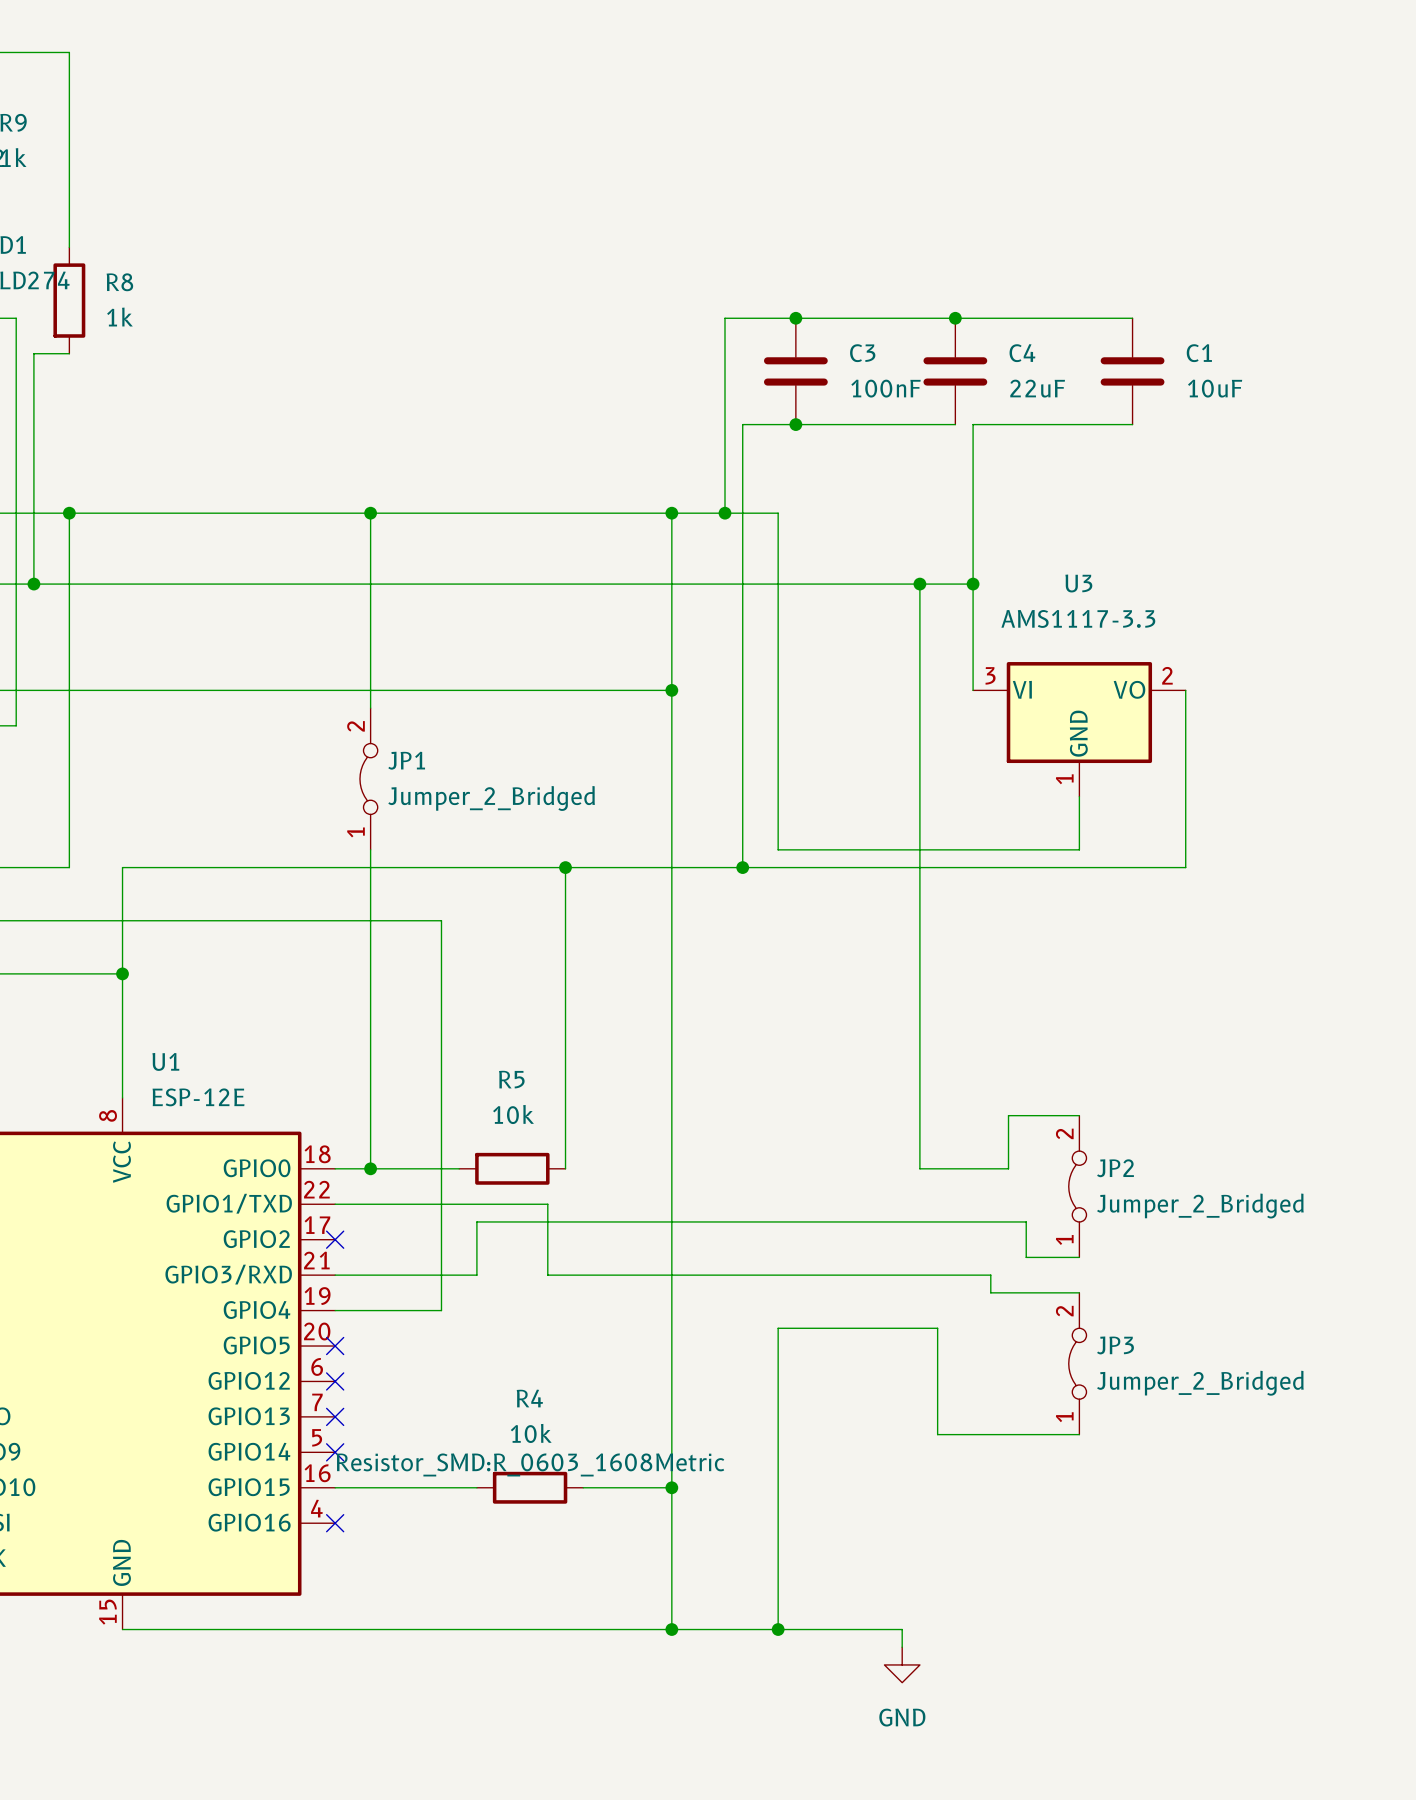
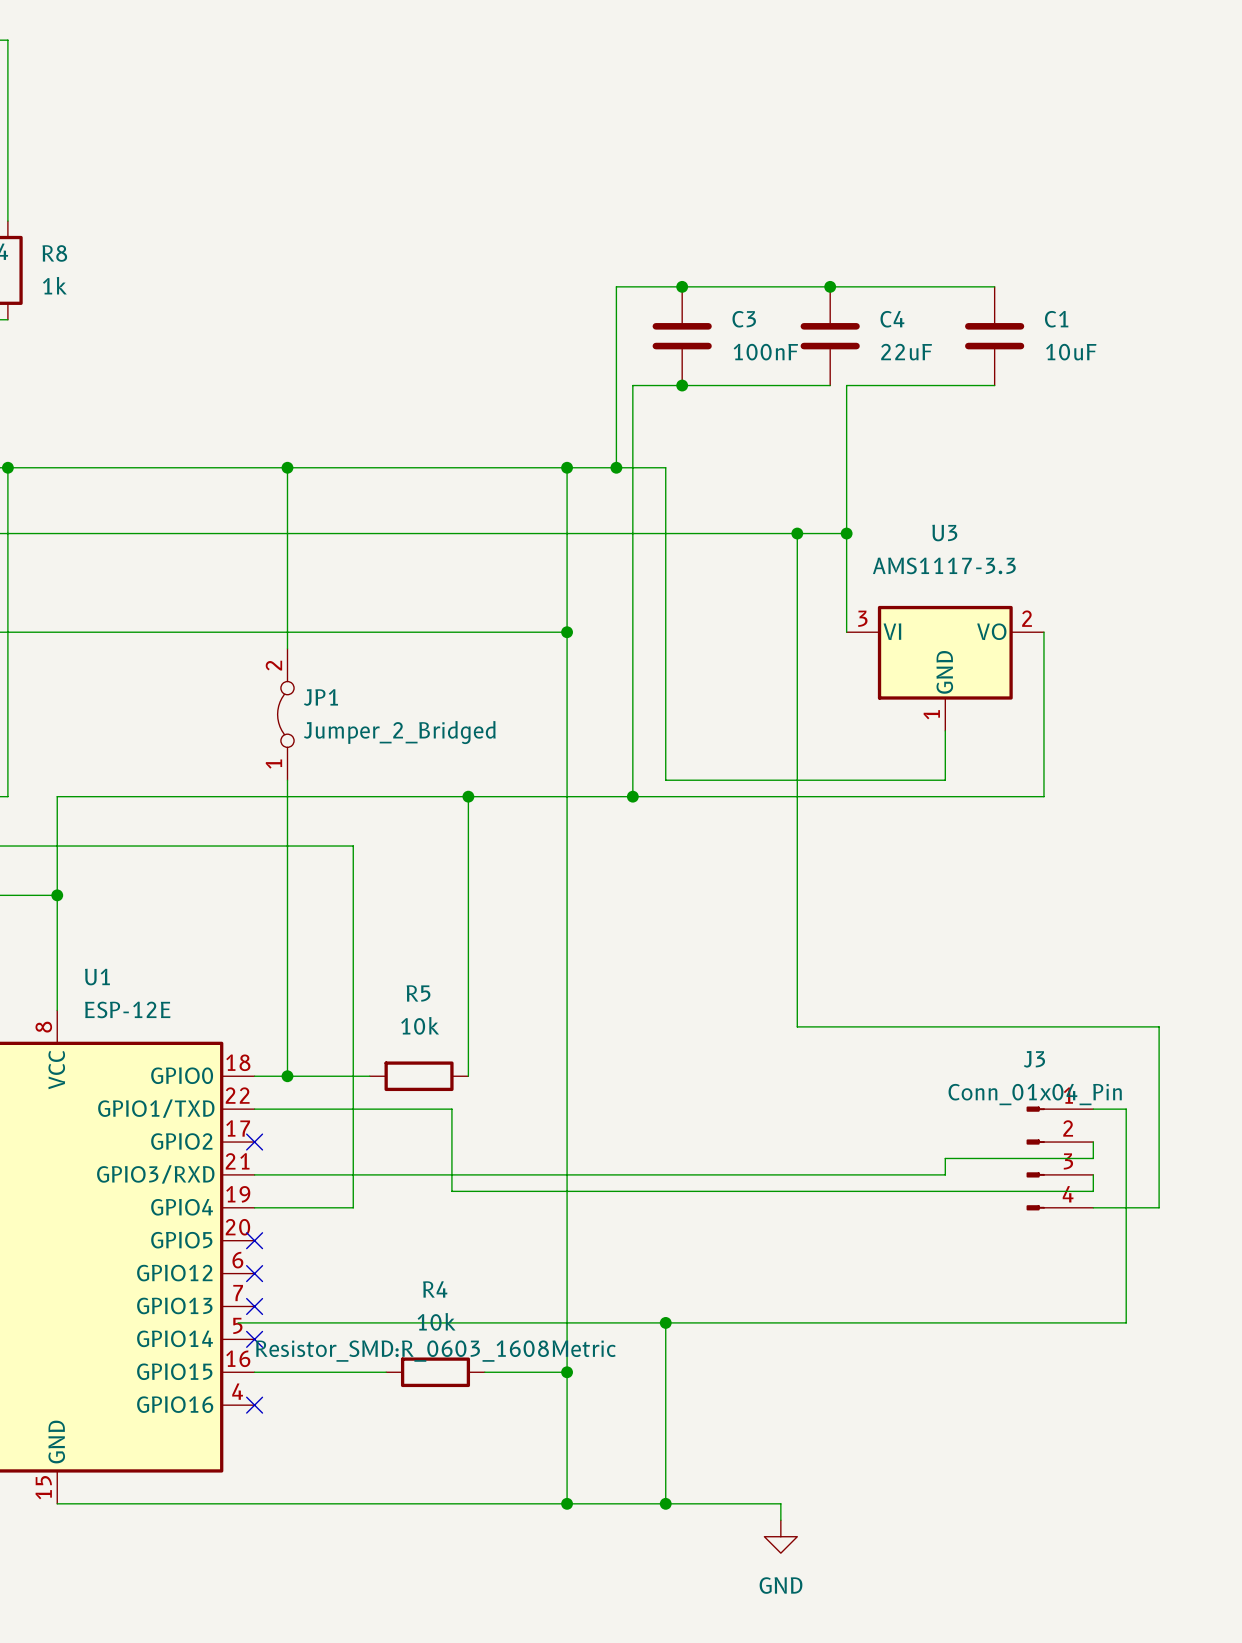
wire: (919, 1115) (919, 1168) (1008, 1168) (1008, 1115) -> (797, 1026) (879, 1026)
wire: none -> (945, 1026) (1159, 1026) (1159, 1207) (1093, 1207)
JP2: Jumper_2_Bridged (1077, 1186) -> none
wire: none -> (1093, 1109) (1126, 1109) (1126, 1322) (945, 1322)
wire: (1079, 1257) (1026, 1257) (1026, 1221) (476, 1221) (476, 1275) -> (863, 1191) (451, 1191) (451, 1174) (386, 1174)
J3: none -> Conn_01x04_Pin (1059, 1158)
wire: (990, 1275) (990, 1292) -> (863, 1174) (945, 1174) (945, 1158) (1093, 1158) (1093, 1142)
wire: none -> (1093, 1174) (1093, 1191) (945, 1191)
JP3: Jumper_2_Bridged (1077, 1363) -> none
wire: (778, 1434) (778, 1328) (937, 1328) (937, 1434) -> (238, 1322) (813, 1322)
junction: none -> (665, 1322)

